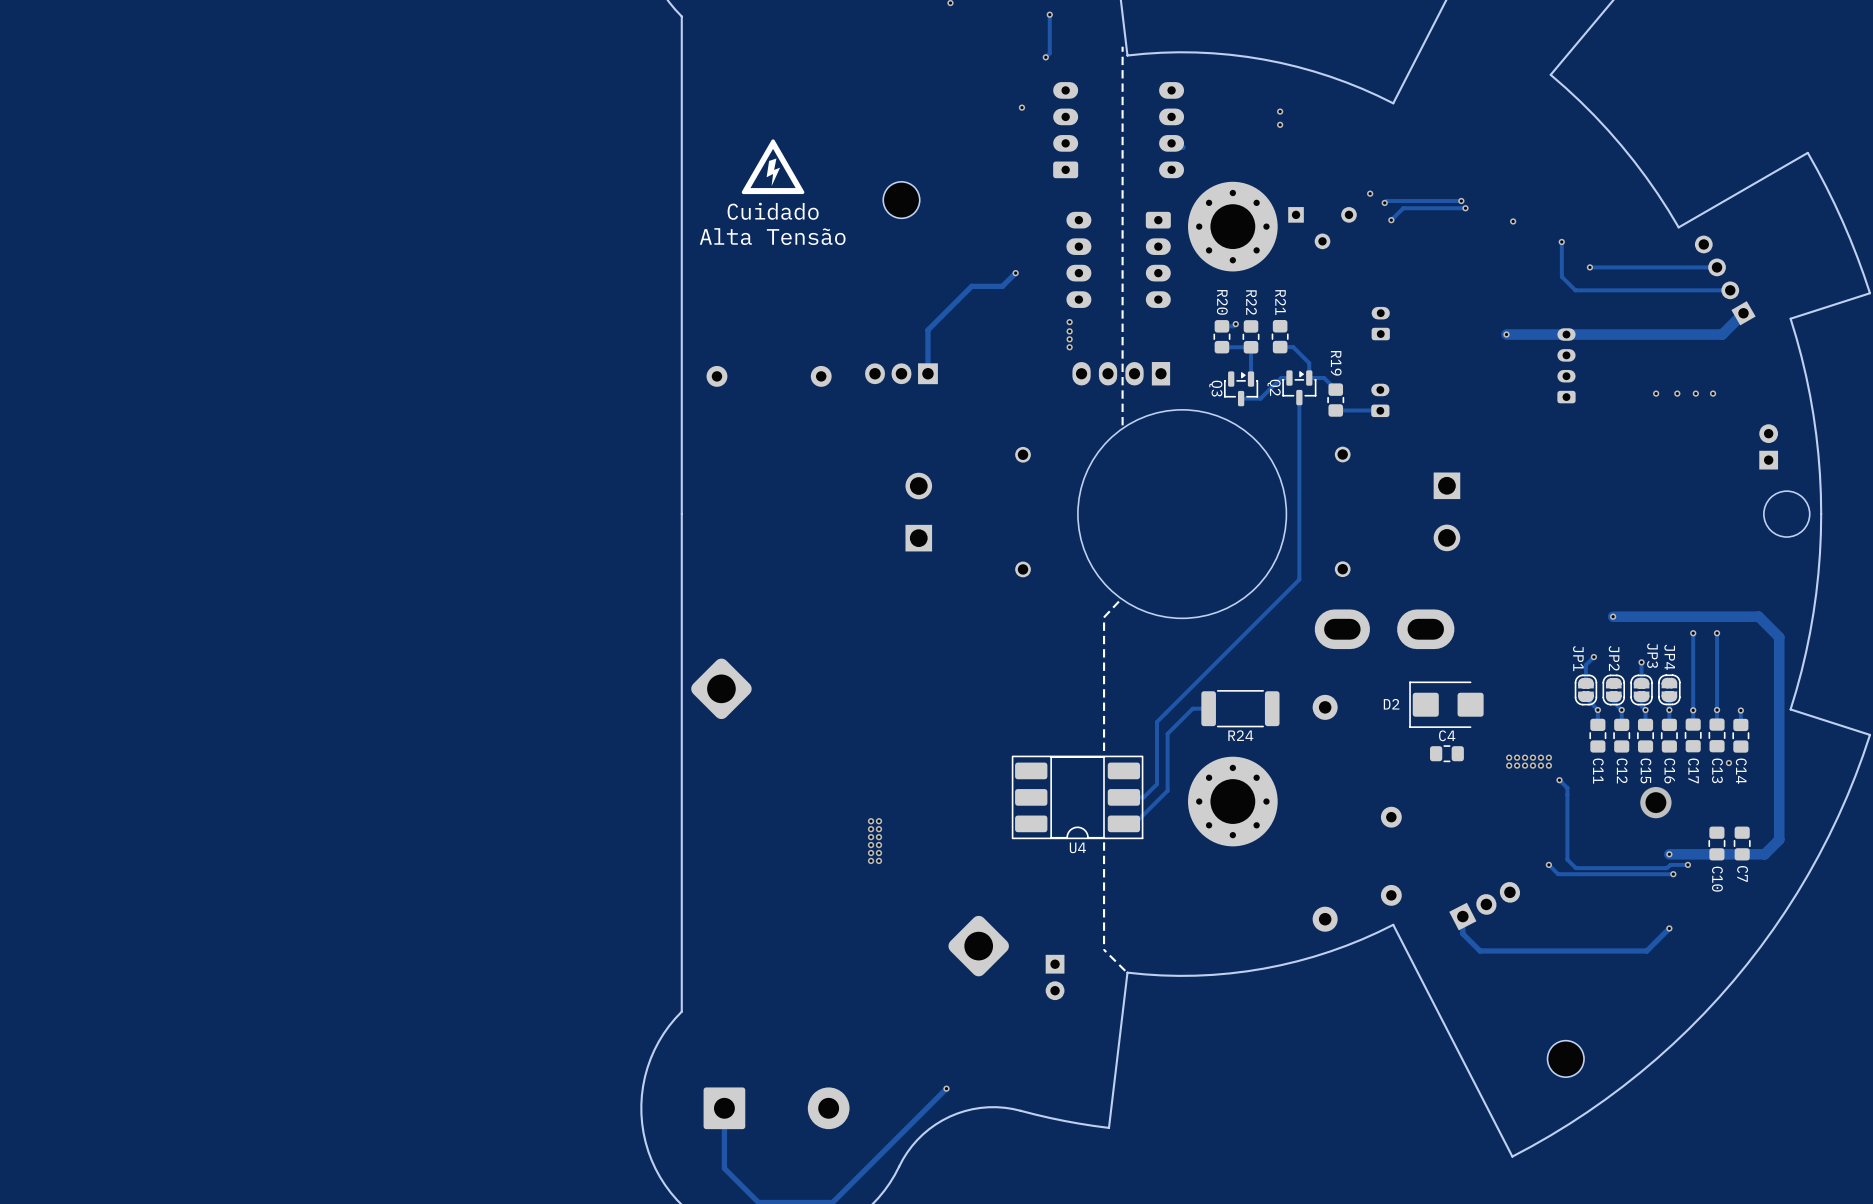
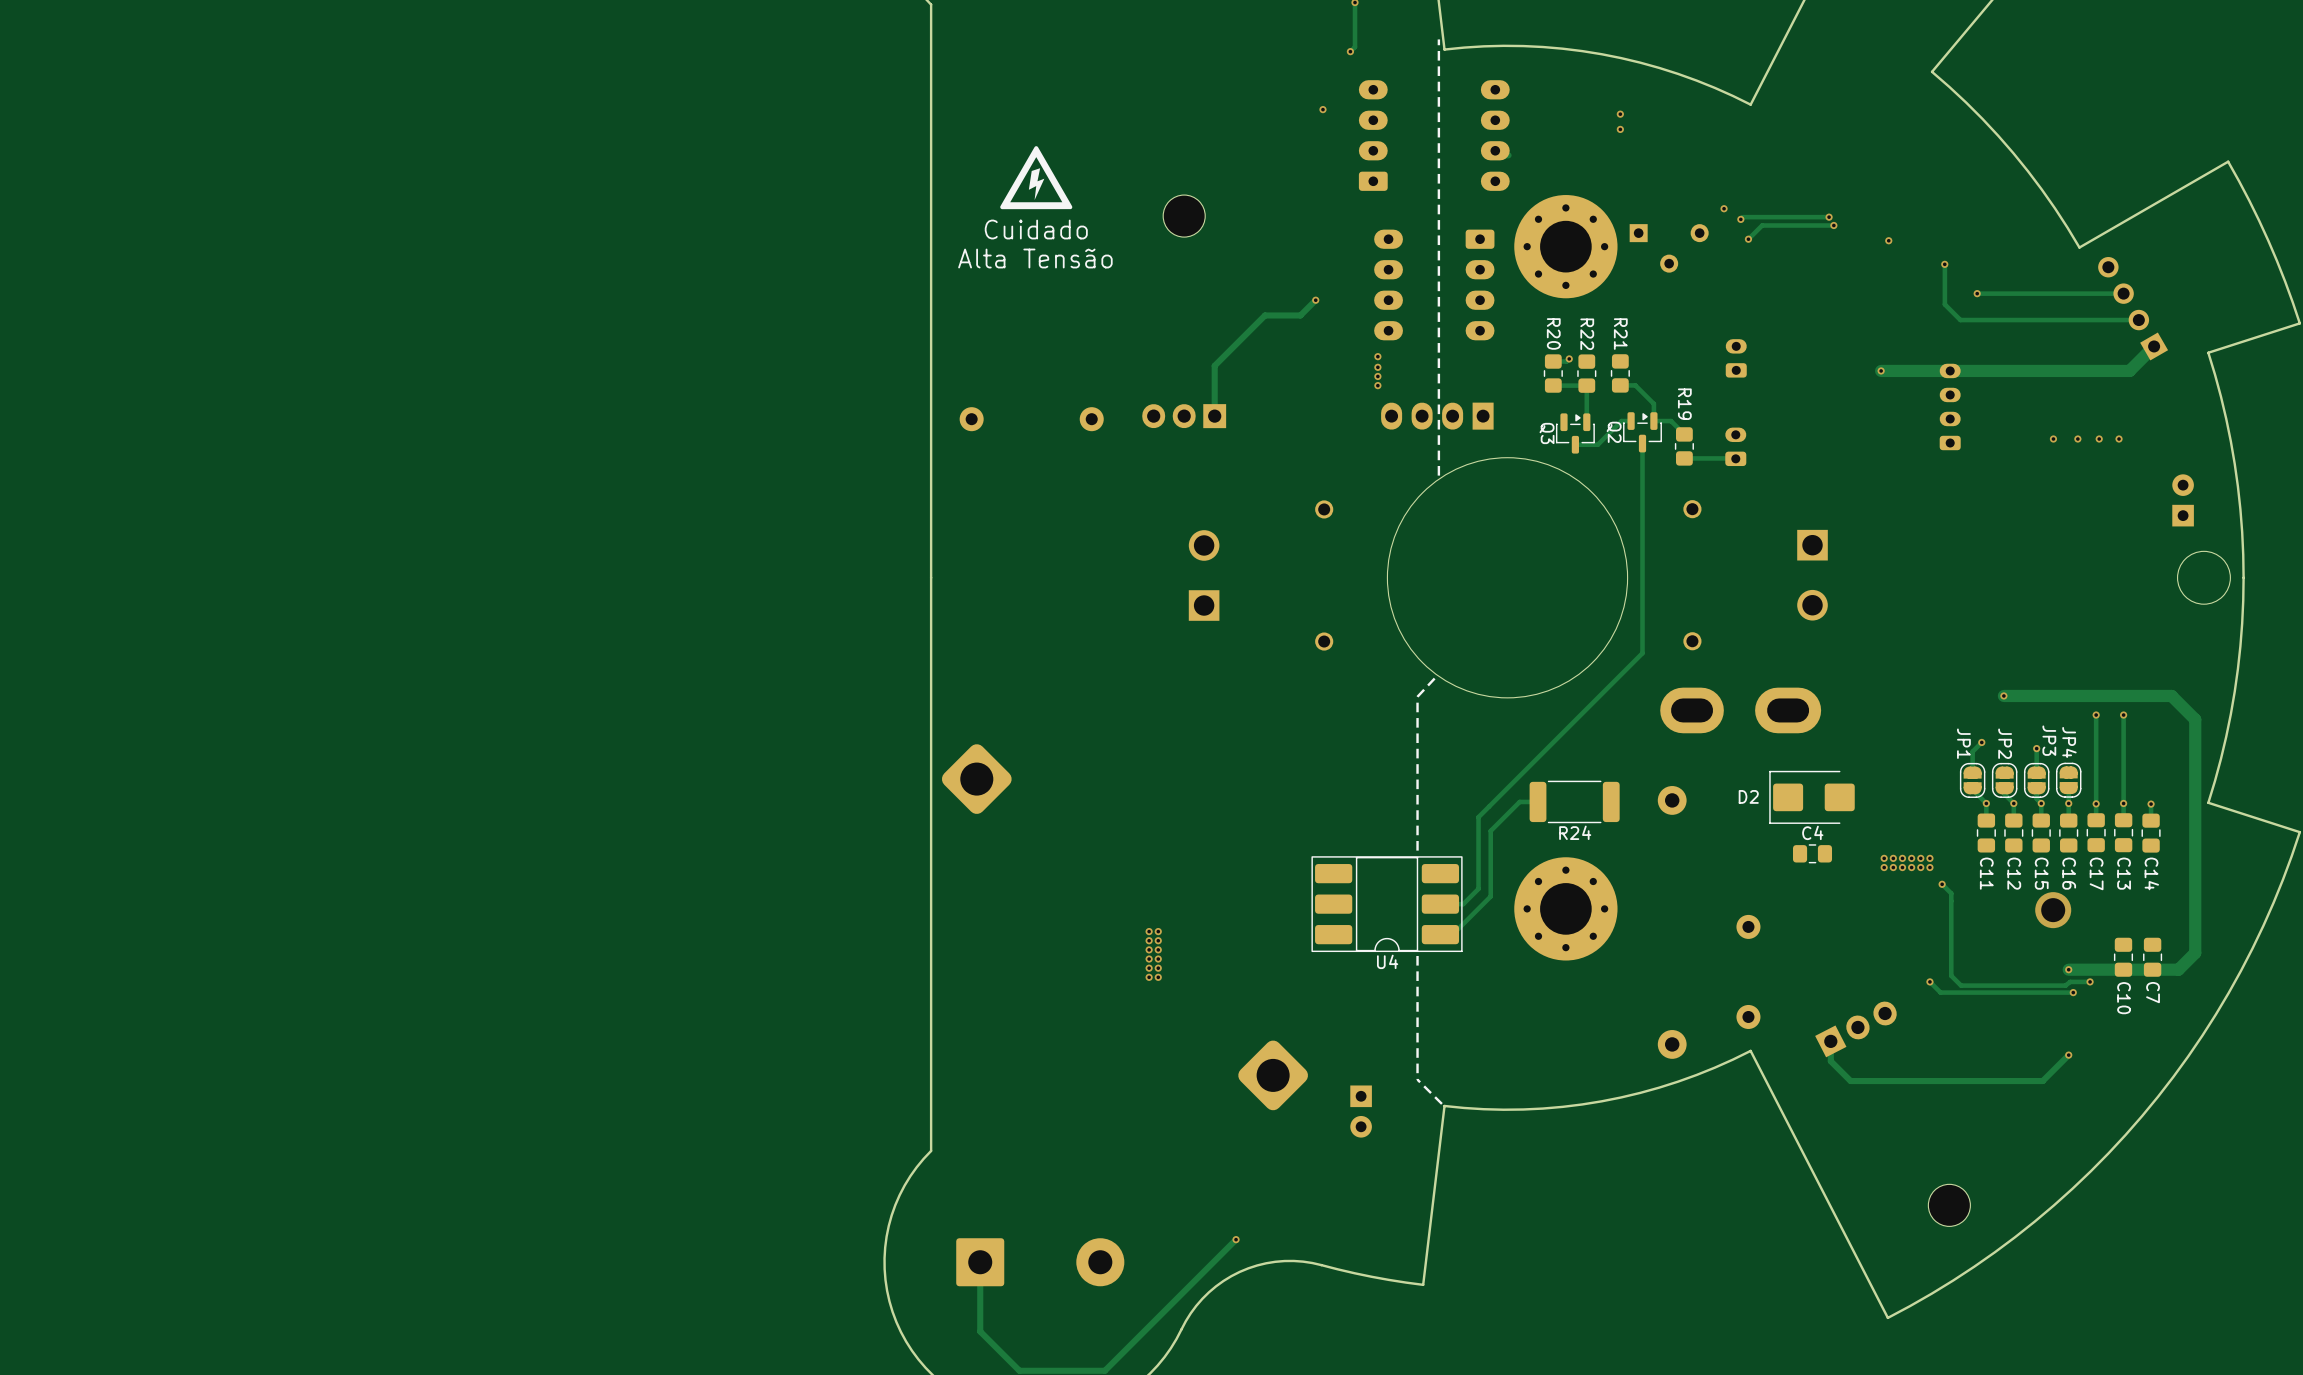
via: (1728, 762) -> none

